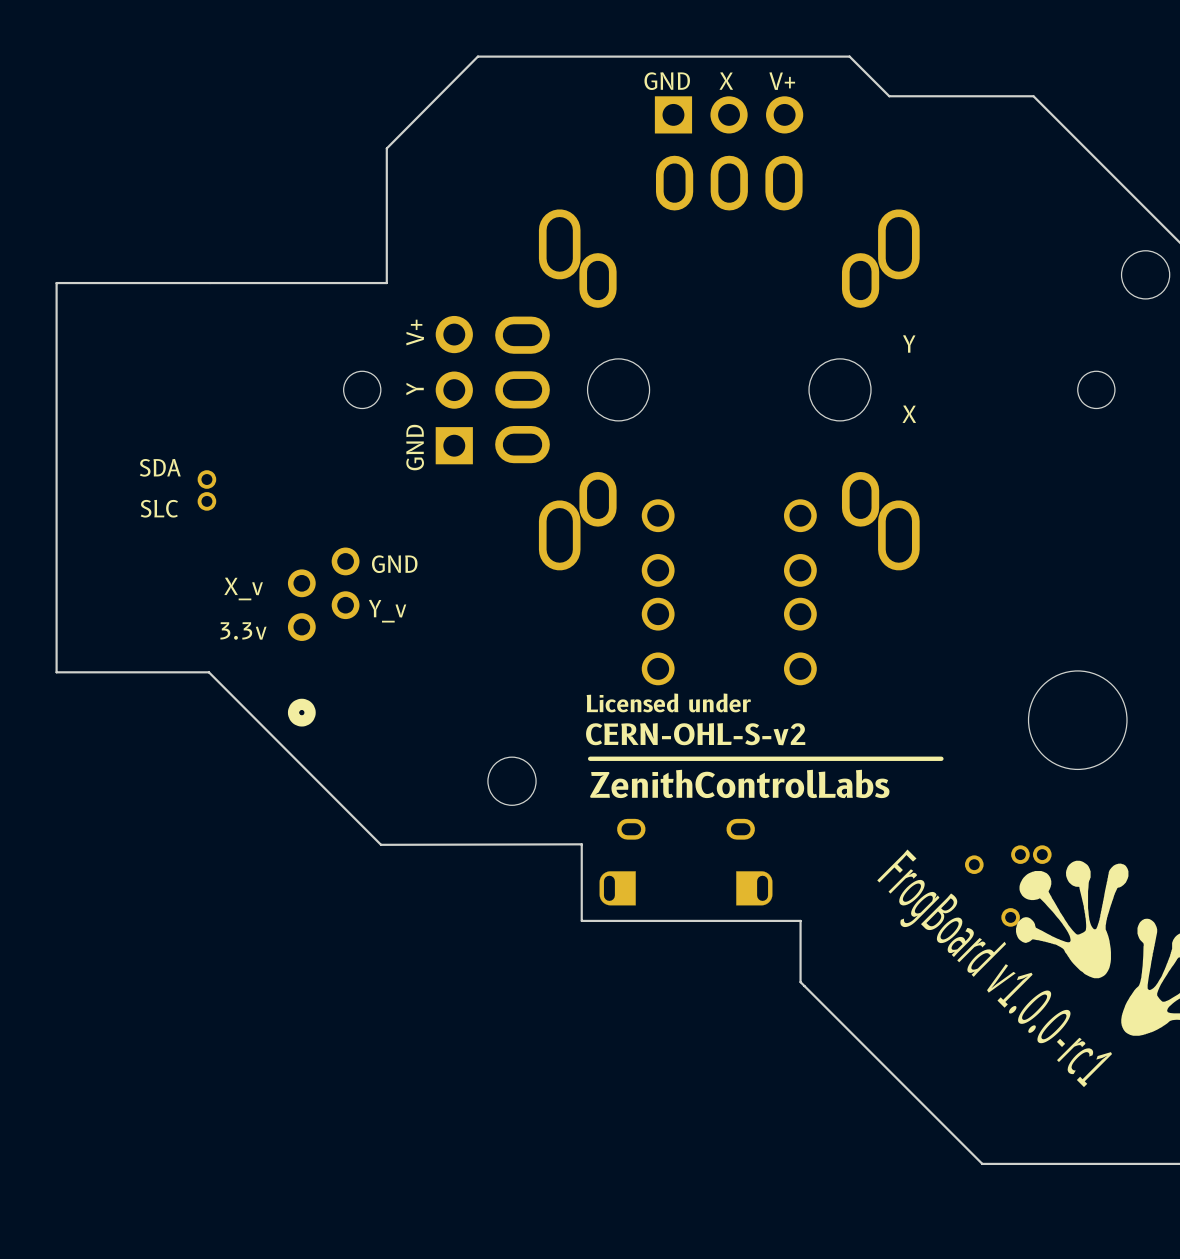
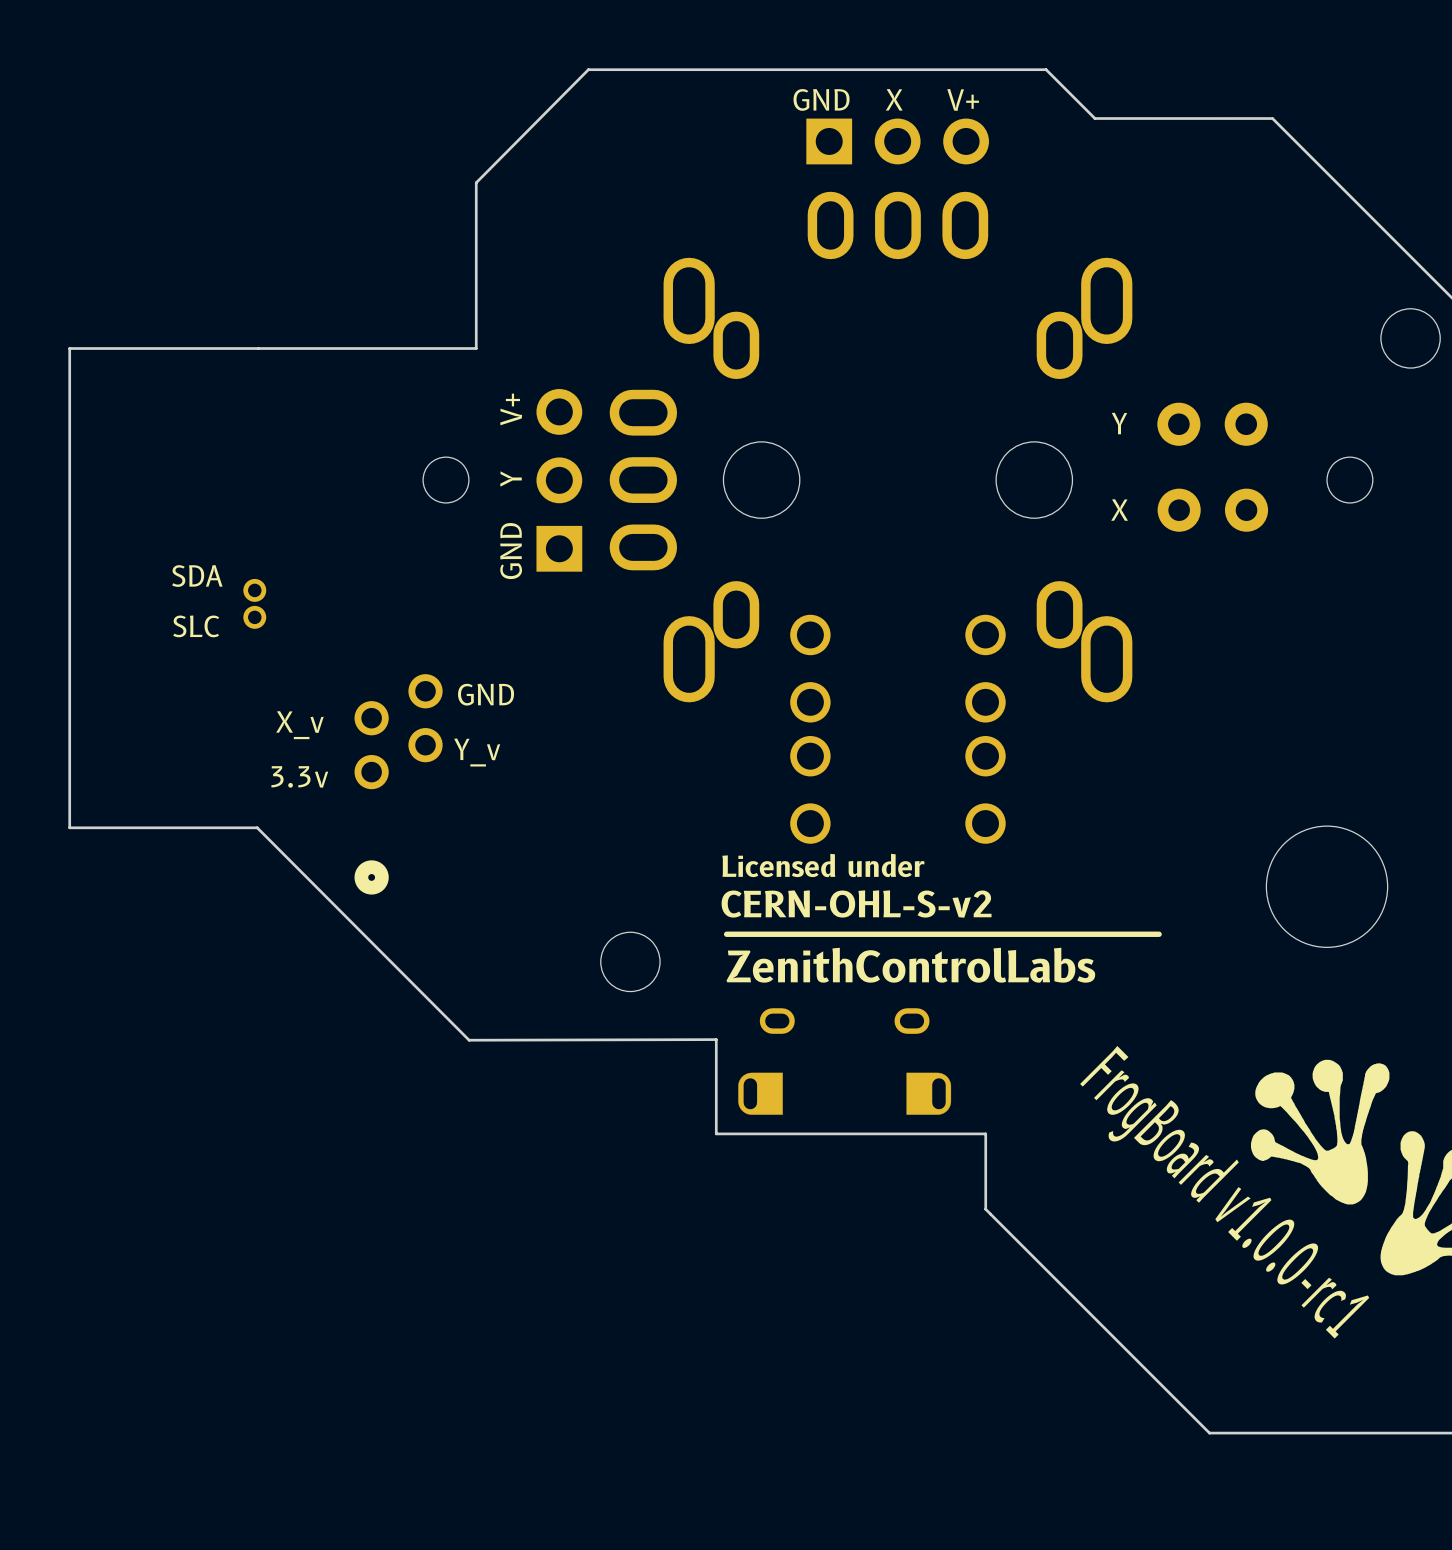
part: none -> (1212, 424)
part: none -> (1212, 510)
part: (1031, 854) -> none
part: (974, 864) -> none
part: (1010, 917) -> none

